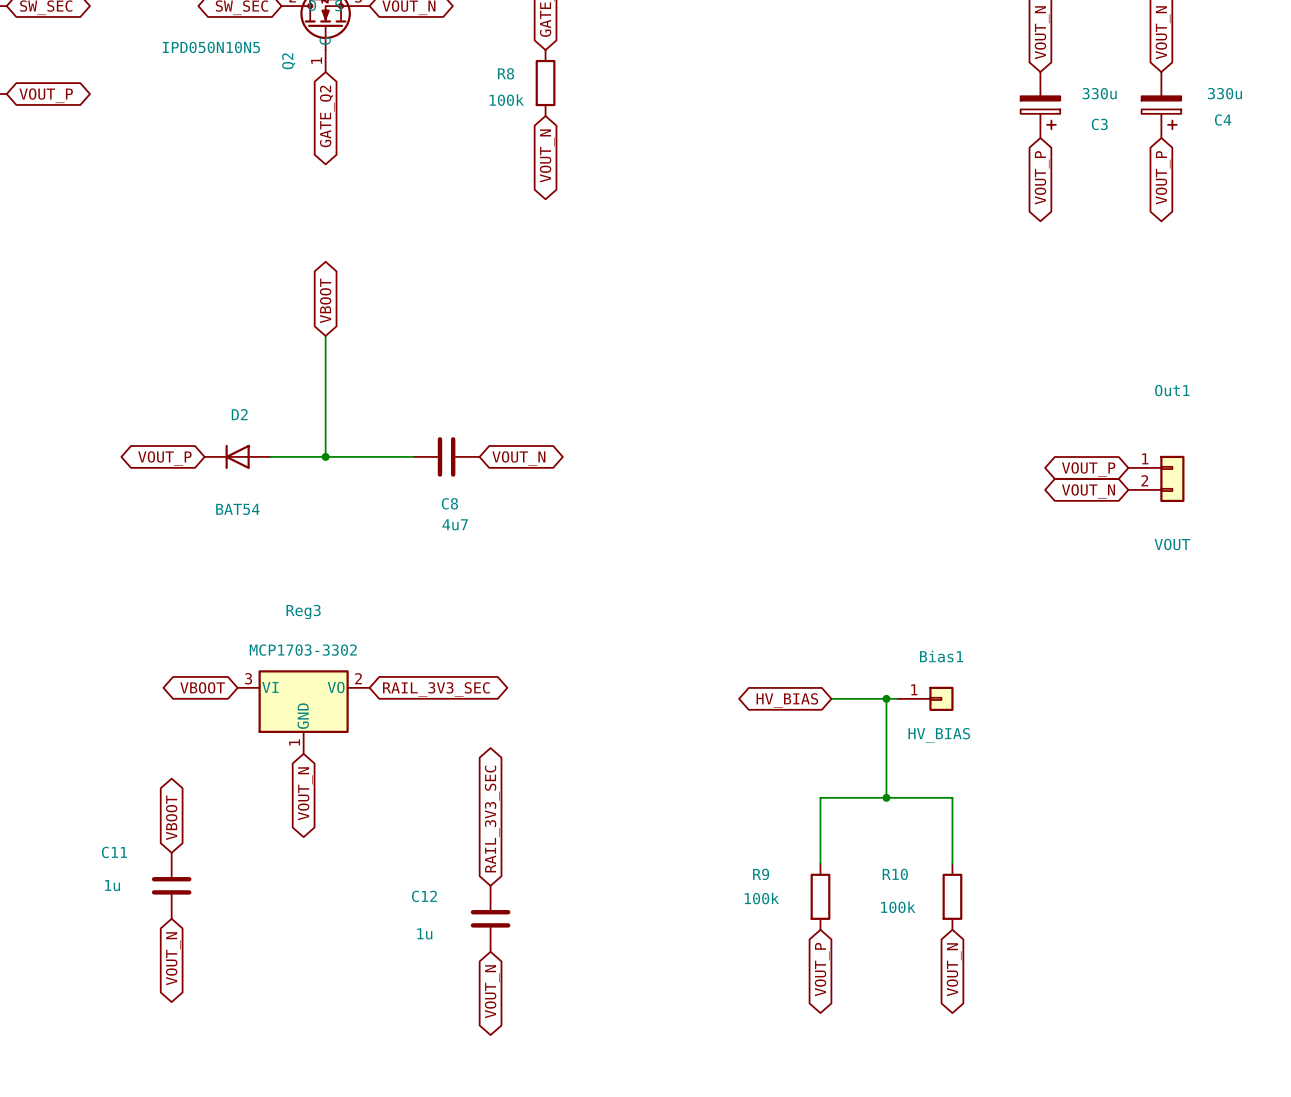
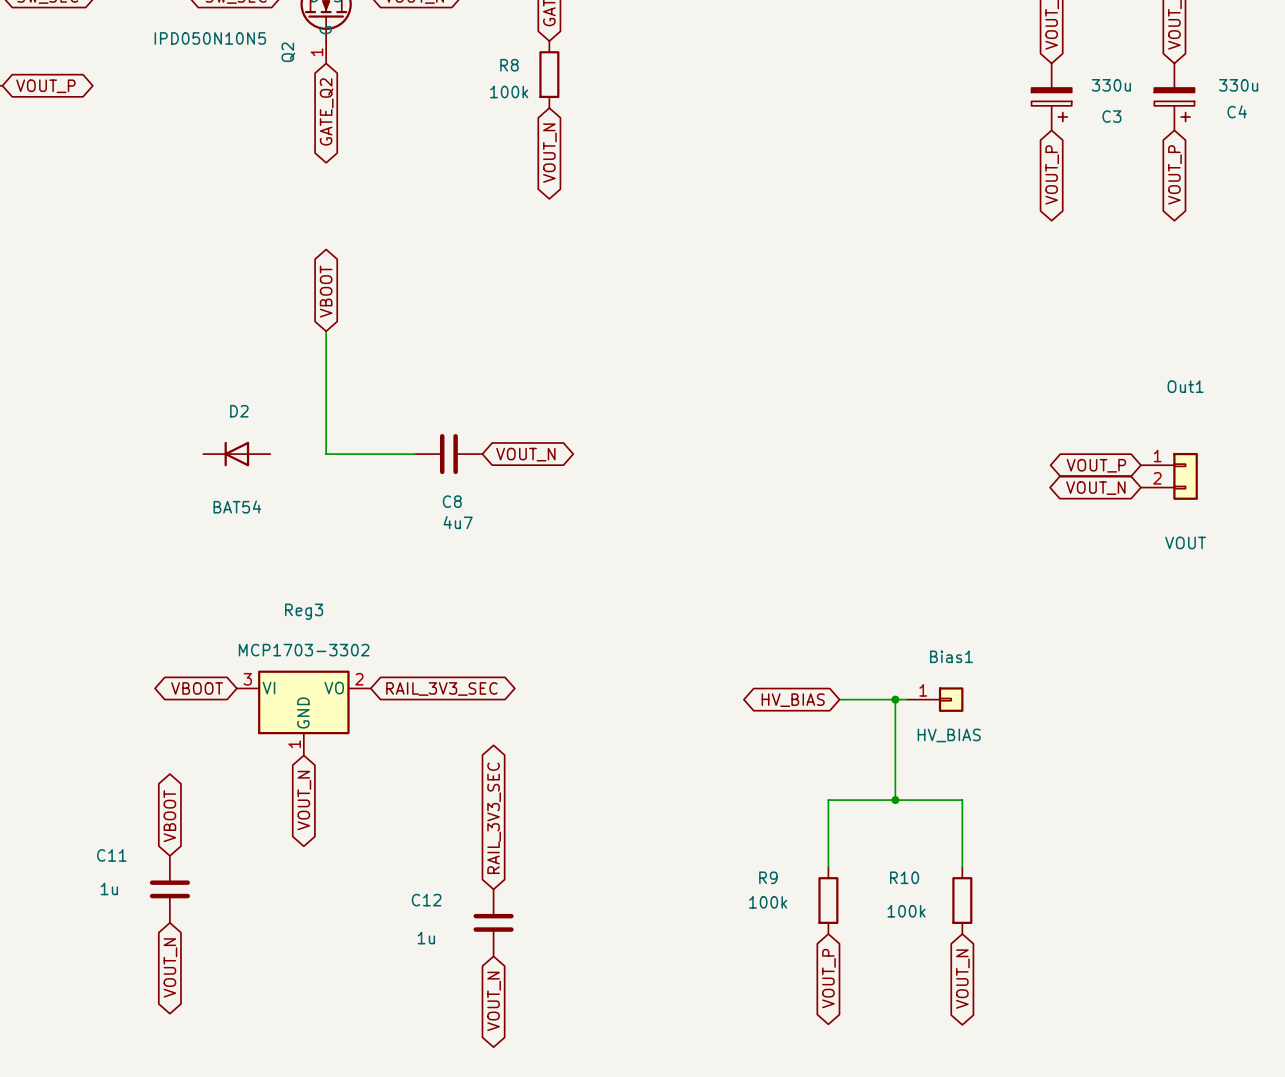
wire: (270, 456) (325, 456) -> none
junction: (325, 456) -> none
global label: VOUT_P (164, 458) -> none

